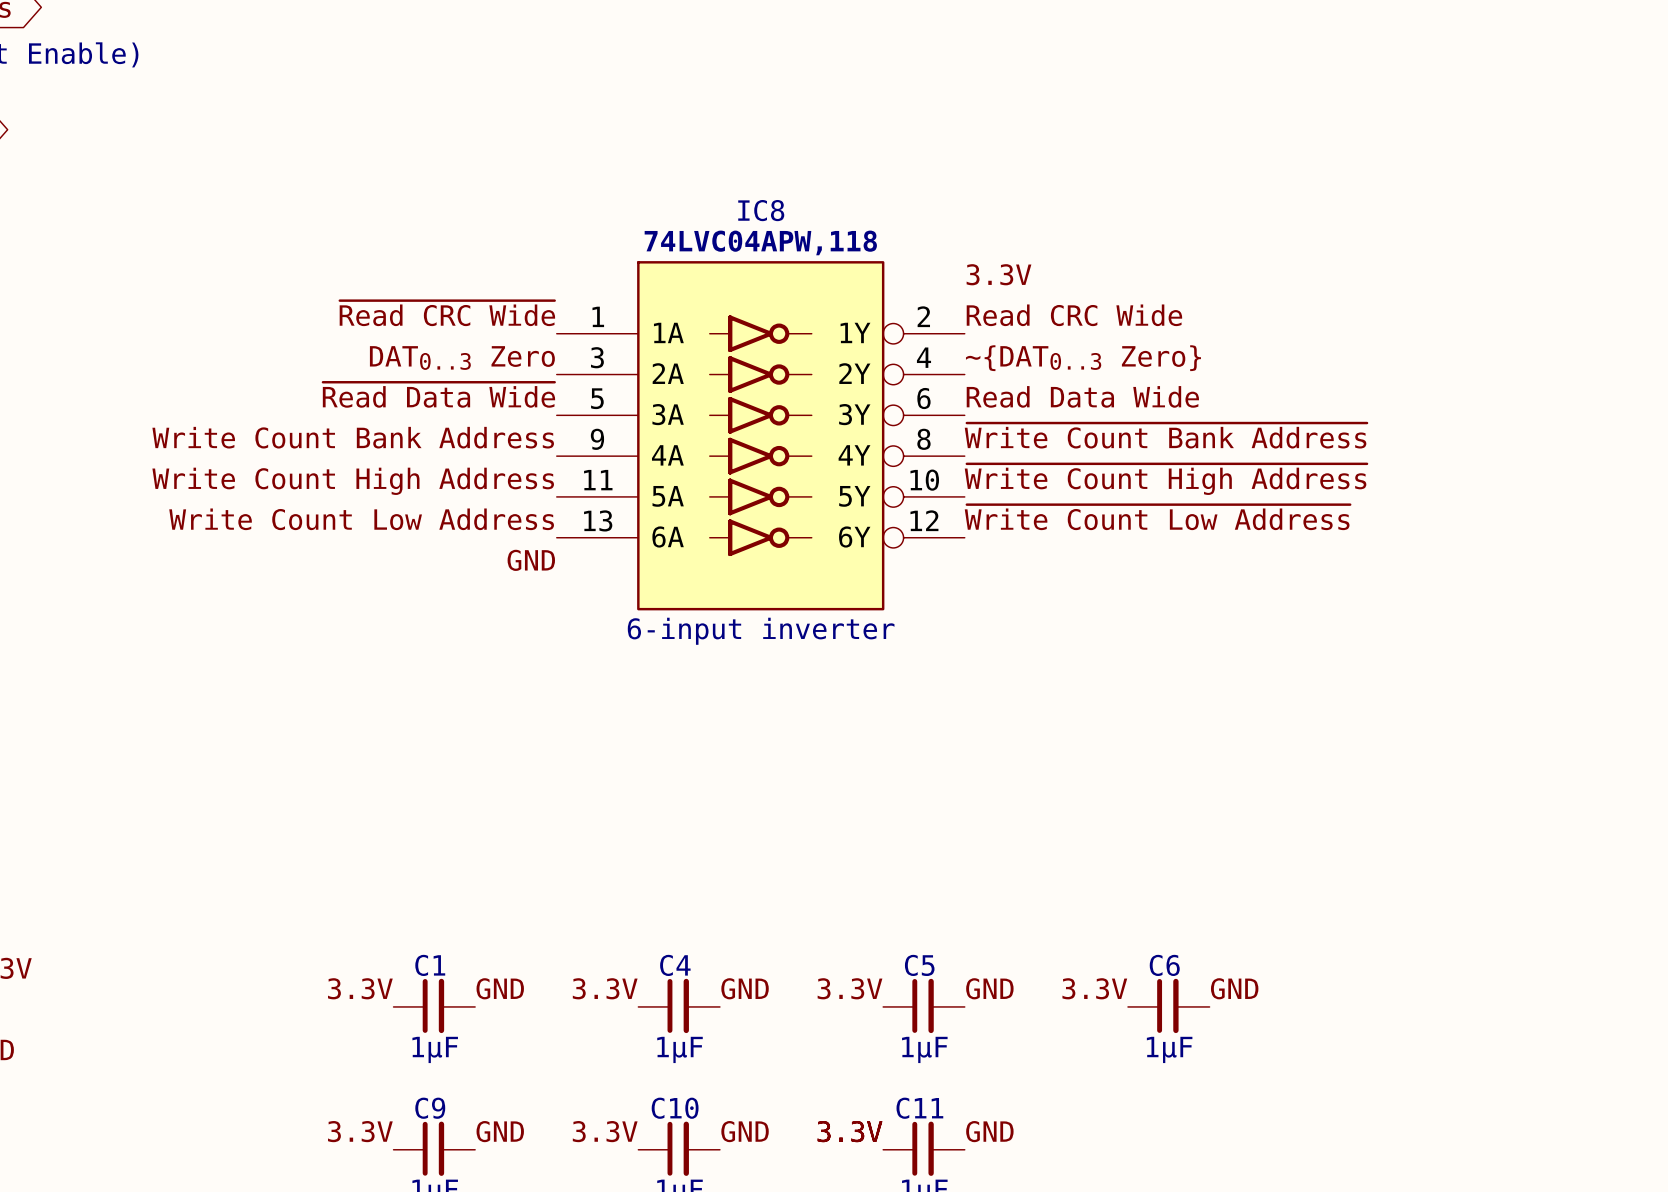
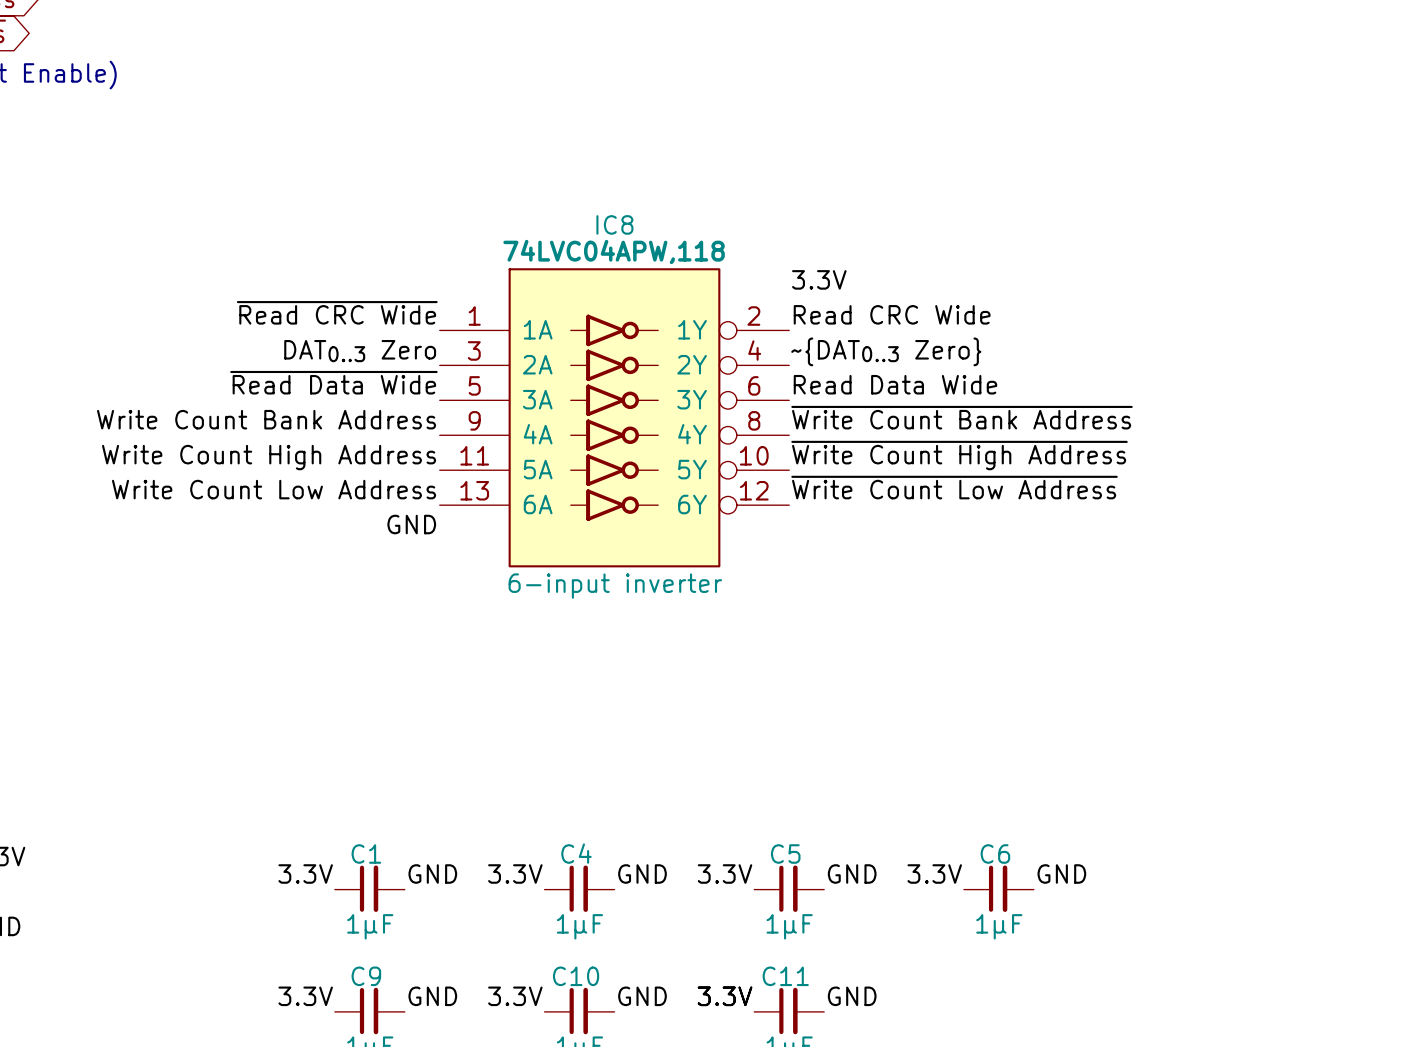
label position: 3.3V (999, 274) -> 3.3V (819, 279)
label position: ~{Read CRC Wide} (447, 313) -> ~{Read CRC Wide} (337, 312)
label position: Read CRC Wide (1074, 315) -> Read CRC Wide (892, 314)
label position: DAT0..3 Zero (462, 358) -> DAT0..3 Zero (360, 351)
label position: ~{DAT0..3 Zero} (1083, 358) -> ~{DAT0..3 Zero} (886, 351)
label position: ~{Read Data Wide} (438, 394) -> ~{Read Data Wide} (333, 382)
label position: Read Data Wide (1082, 396) -> Read Data Wide (895, 384)
IC8 position: (760, 435) -> (614, 417)
label position: ~{Write Count Bank Address} (1165, 435) -> ~{Write Count Bank Address} (962, 417)
label position: Write Count Bank Address (353, 437) -> Write Count Bank Address (266, 419)
label position: ~{Write Count High Address} (1165, 479) -> ~{Write Count High Address} (959, 455)
label position: Write Count High Address (353, 481) -> Write Count High Address (269, 457)
label position: ~{Write Count Low Address} (1157, 517) -> ~{Write Count Low Address} (954, 487)
label position: Write Count Low Address (361, 519) -> Write Count Low Address (274, 489)
label position: GND (531, 560) -> GND (411, 524)

